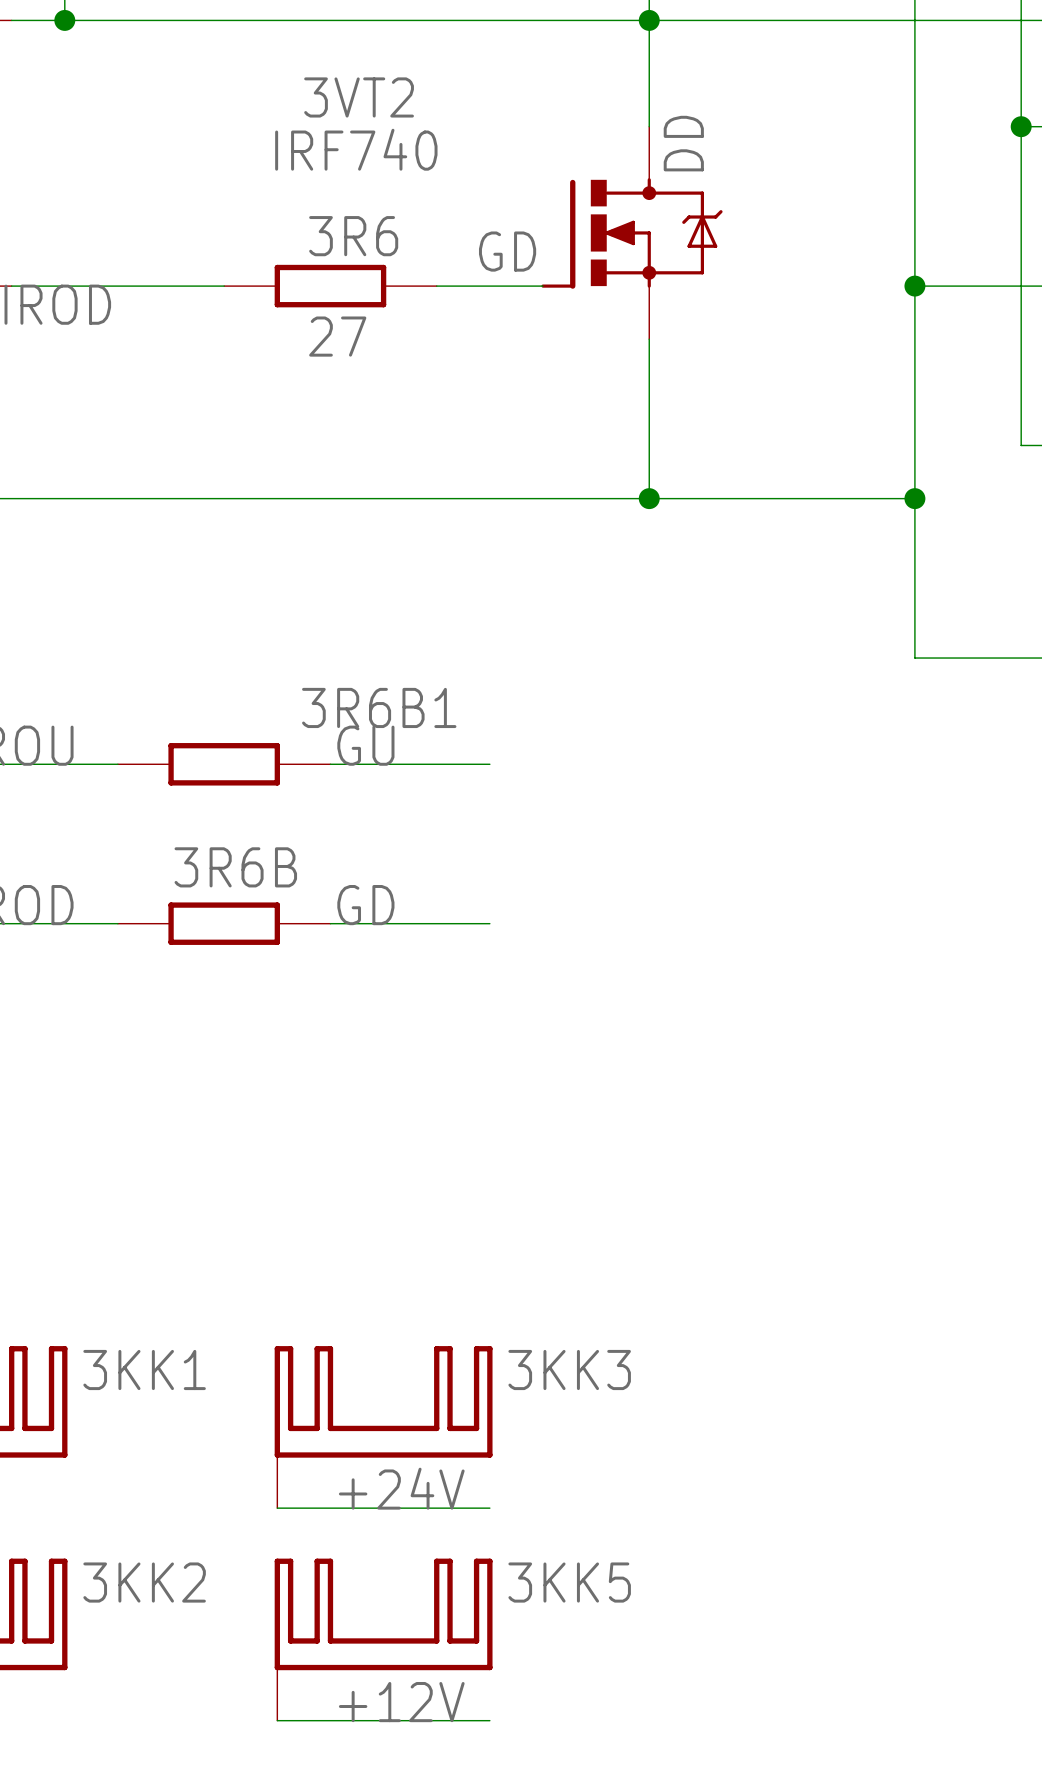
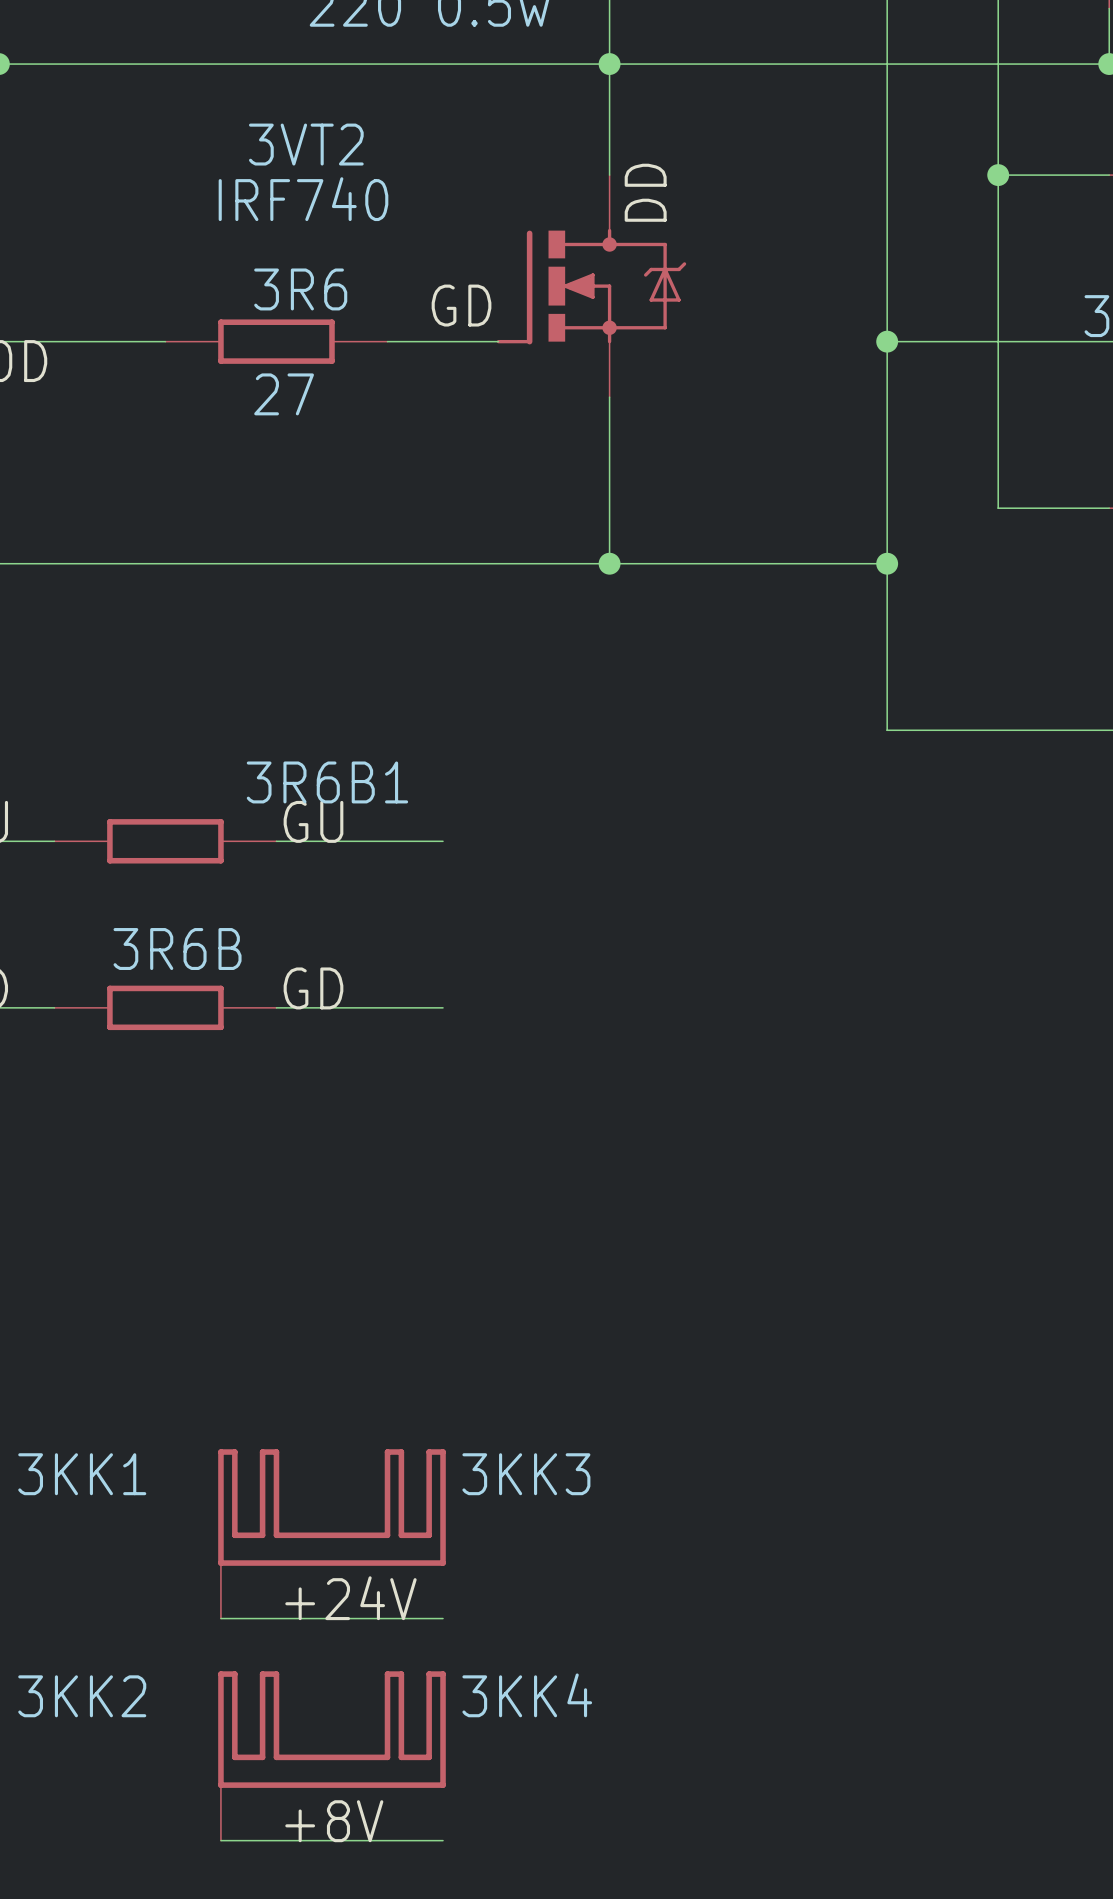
3KK5 name: 3KK5 (569, 1582) -> 3KK4 (527, 1695)
label: +12V (401, 1702) -> +8V (334, 1821)

